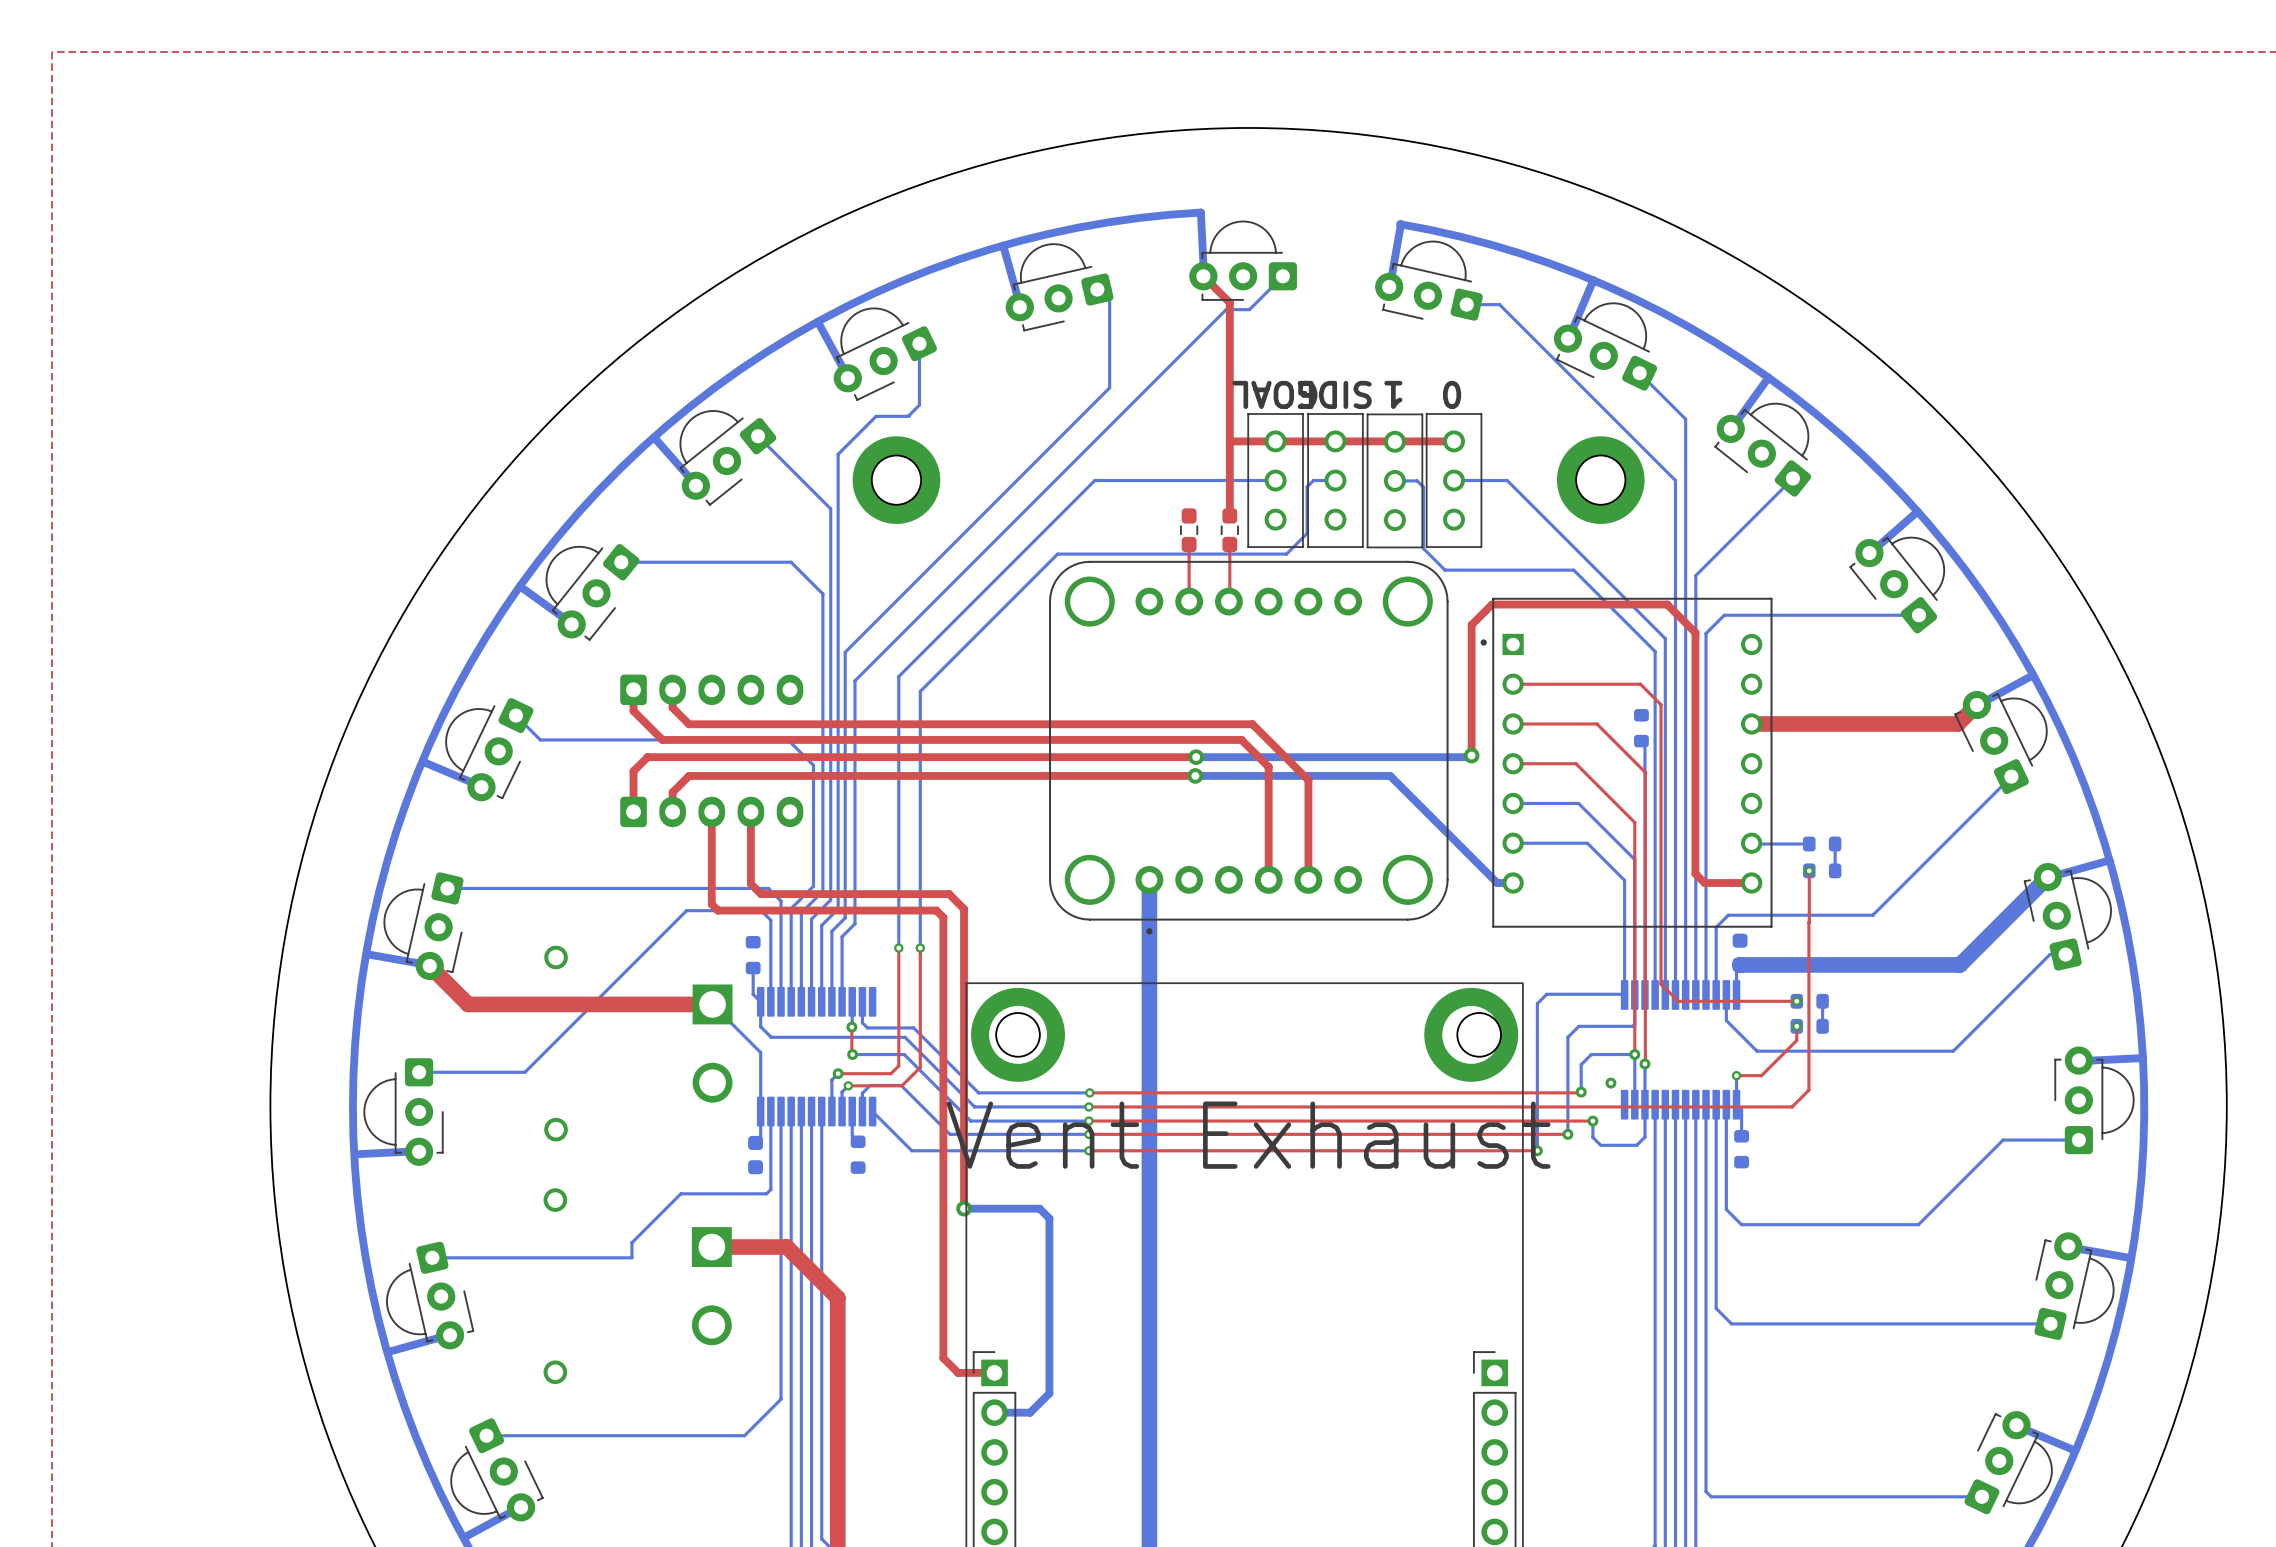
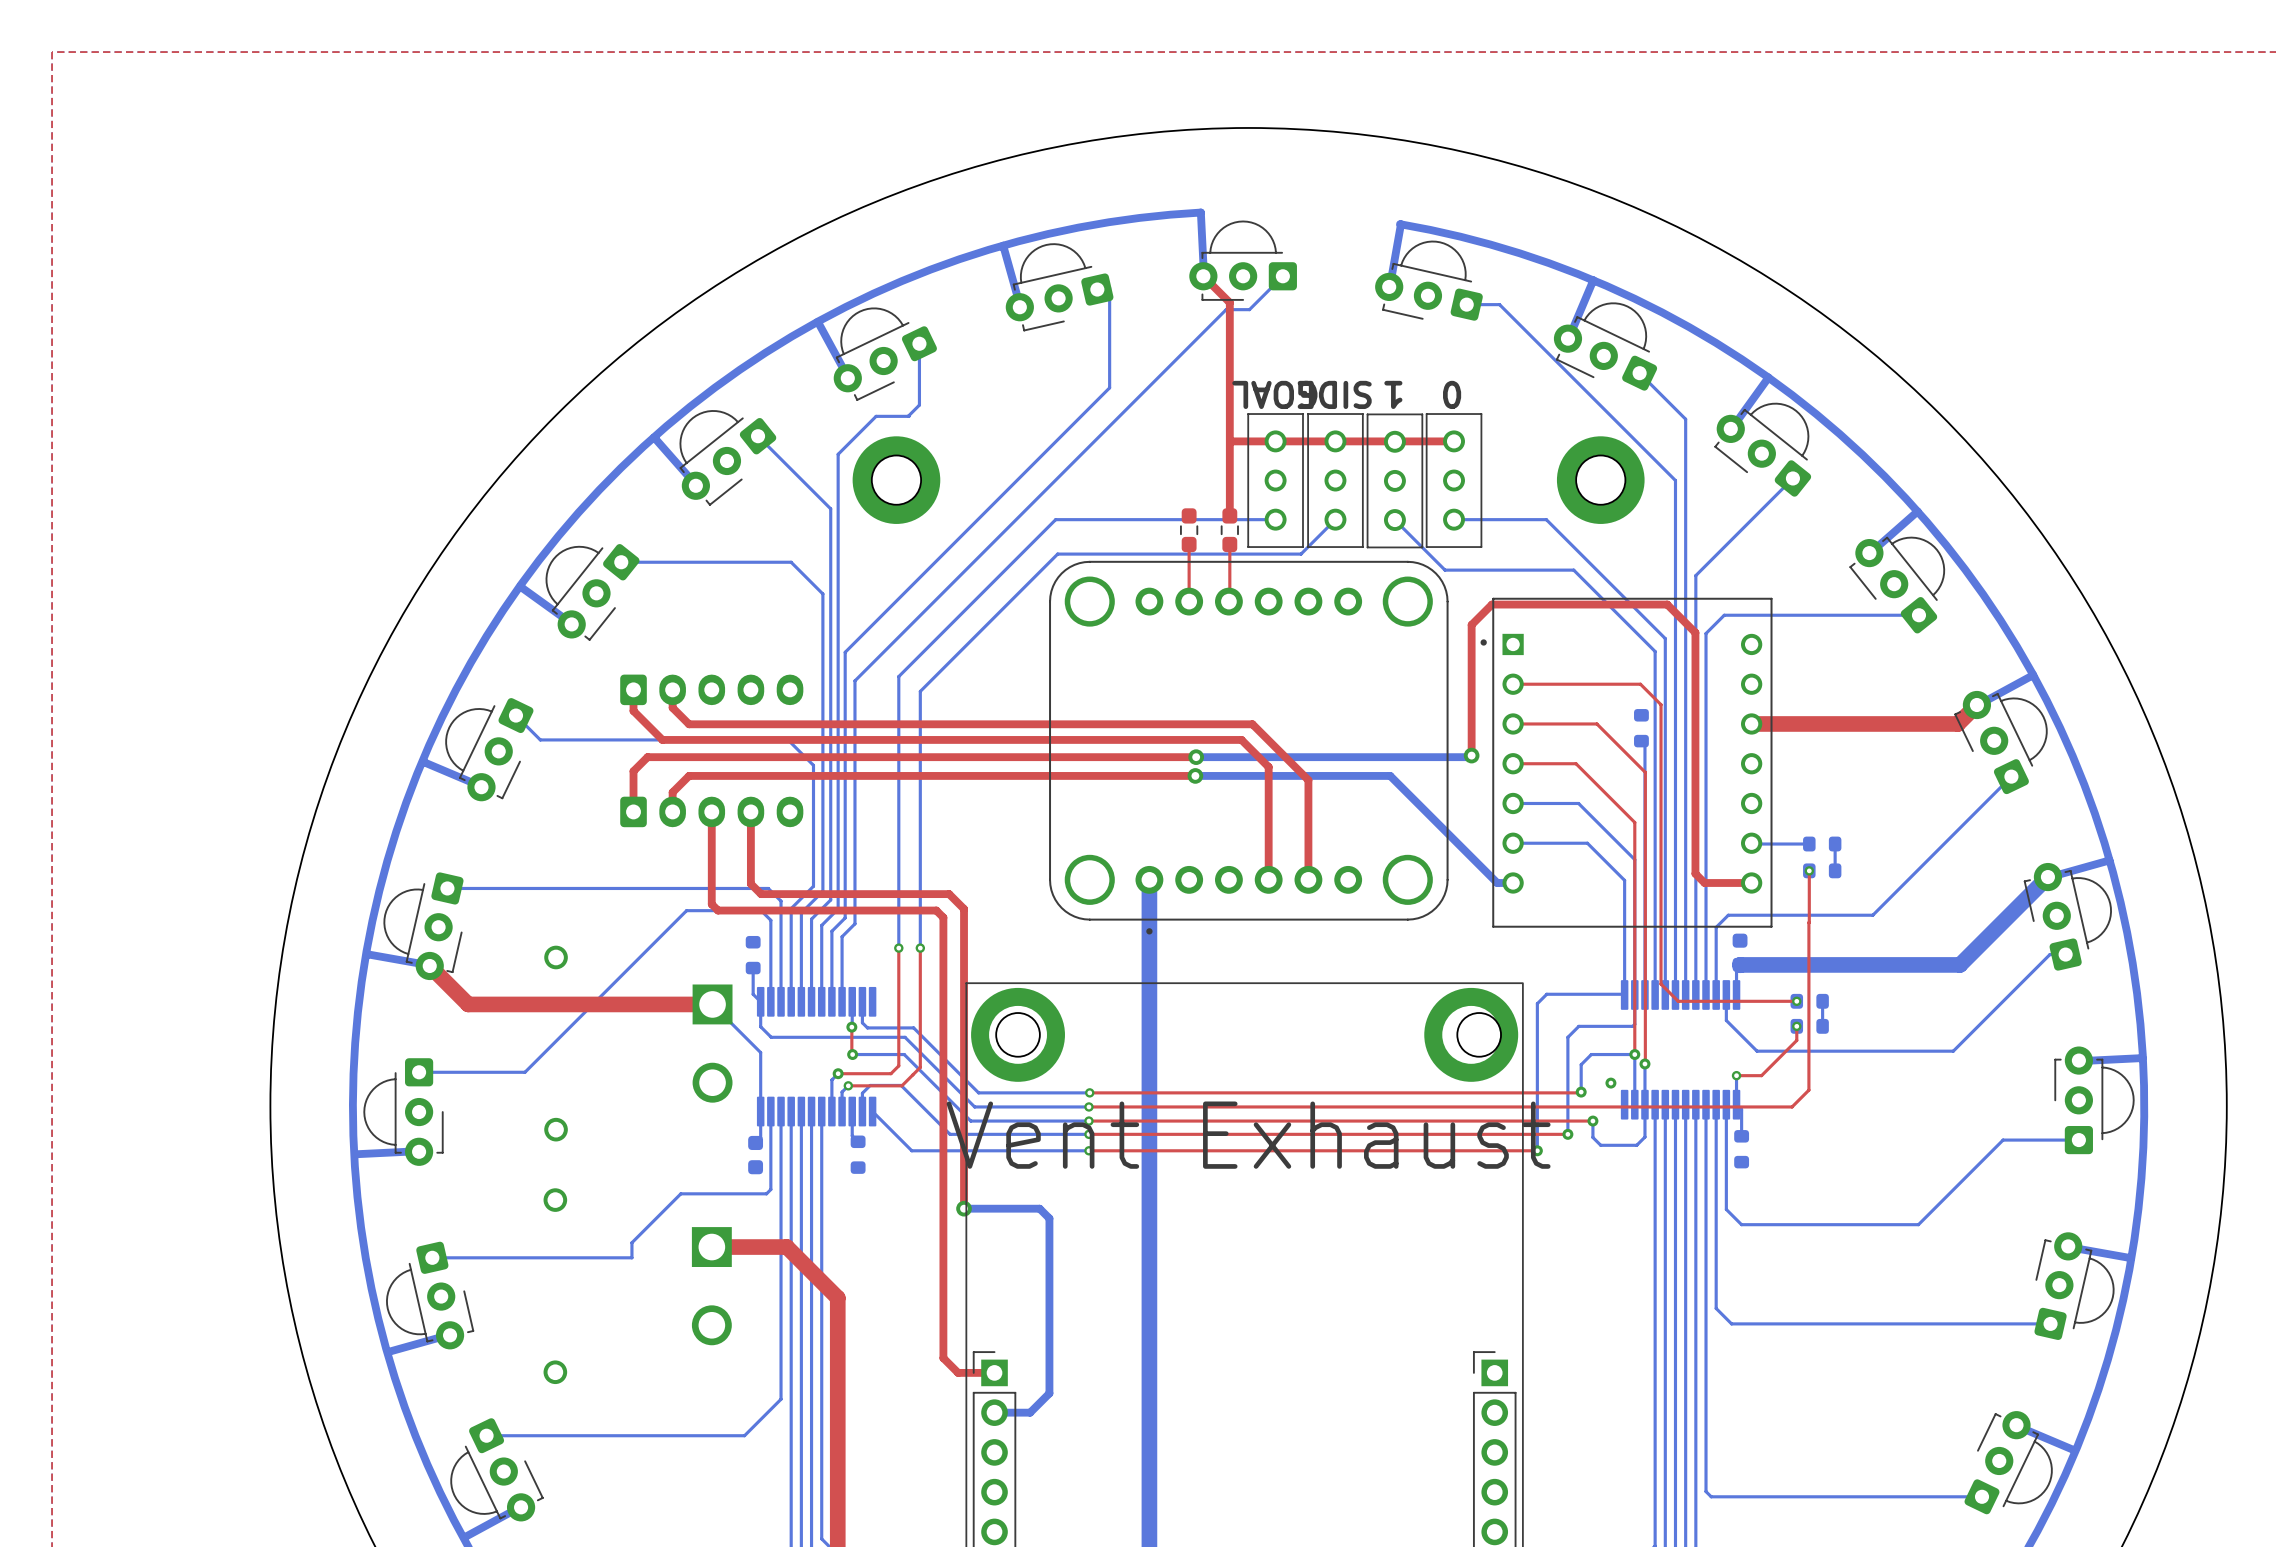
bottom track: (1275, 480) (1094, 480) (1055, 519) -> (1275, 519) (1055, 519)
bottom track: (1335, 480) (1313, 480) (1307, 486) (1307, 533) (1286, 554) -> (1335, 519) (1301, 554) (1286, 554)
bottom track: (1394, 480) (1417, 480) (1423, 487) (1423, 548) -> (1394, 520) (1423, 548)
bottom track: (1454, 480) (1507, 480) (1546, 519) -> (1454, 519) (1546, 519)

